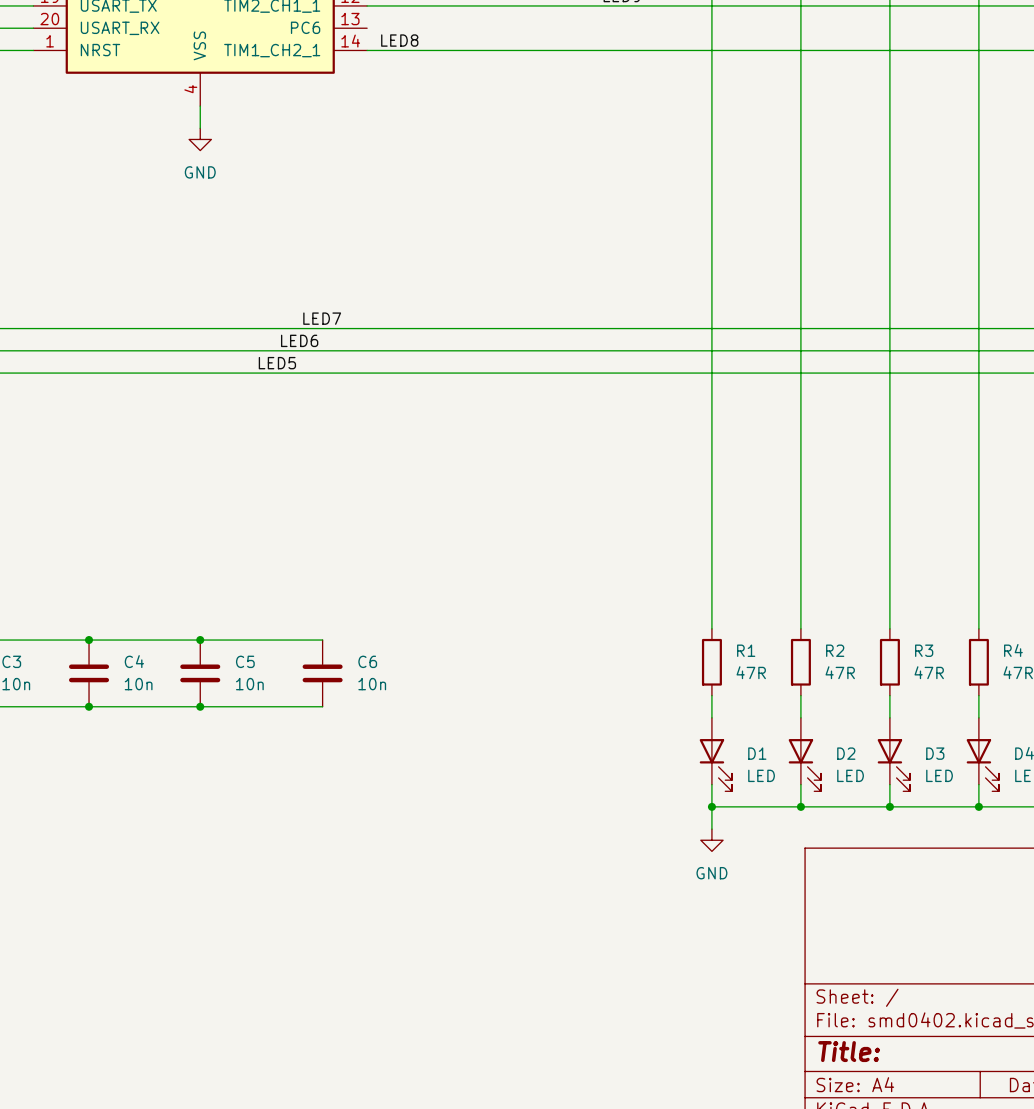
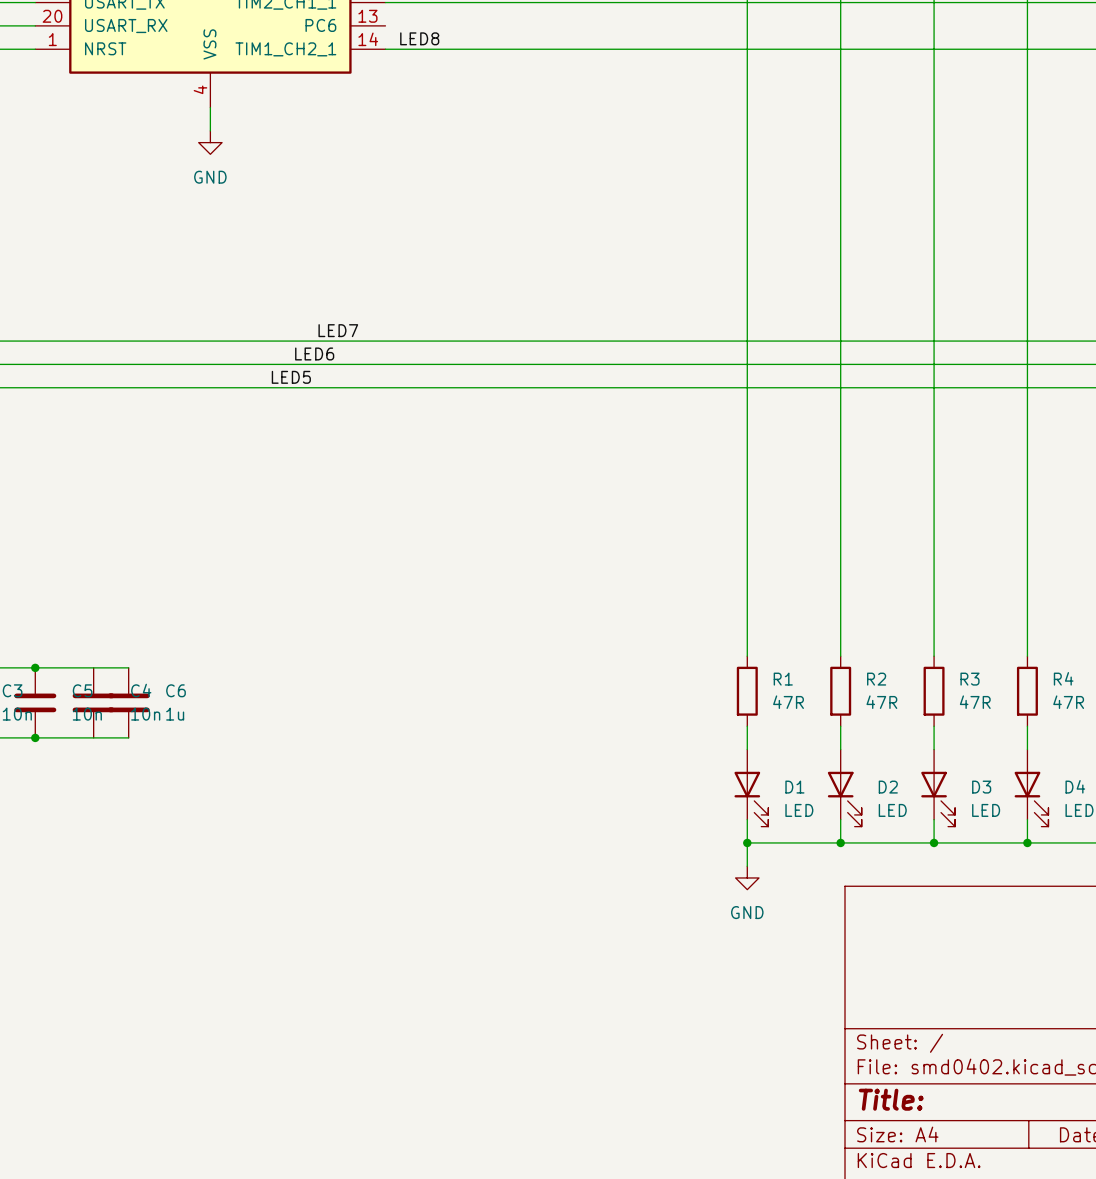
junction: none -> (35, 667)
junction: (89, 640) -> none
wire: (122, 640) (322, 640) -> none
junction: (200, 640) -> none
C5 position: (200, 673) -> (35, 702)
C6 position: (322, 673) -> (128, 702)
C6 value: 10n (372, 684) -> 1u (175, 714)
junction: none -> (35, 737)
junction: (89, 706) -> none
wire: (122, 706) (322, 706) -> none
junction: (200, 706) -> none

